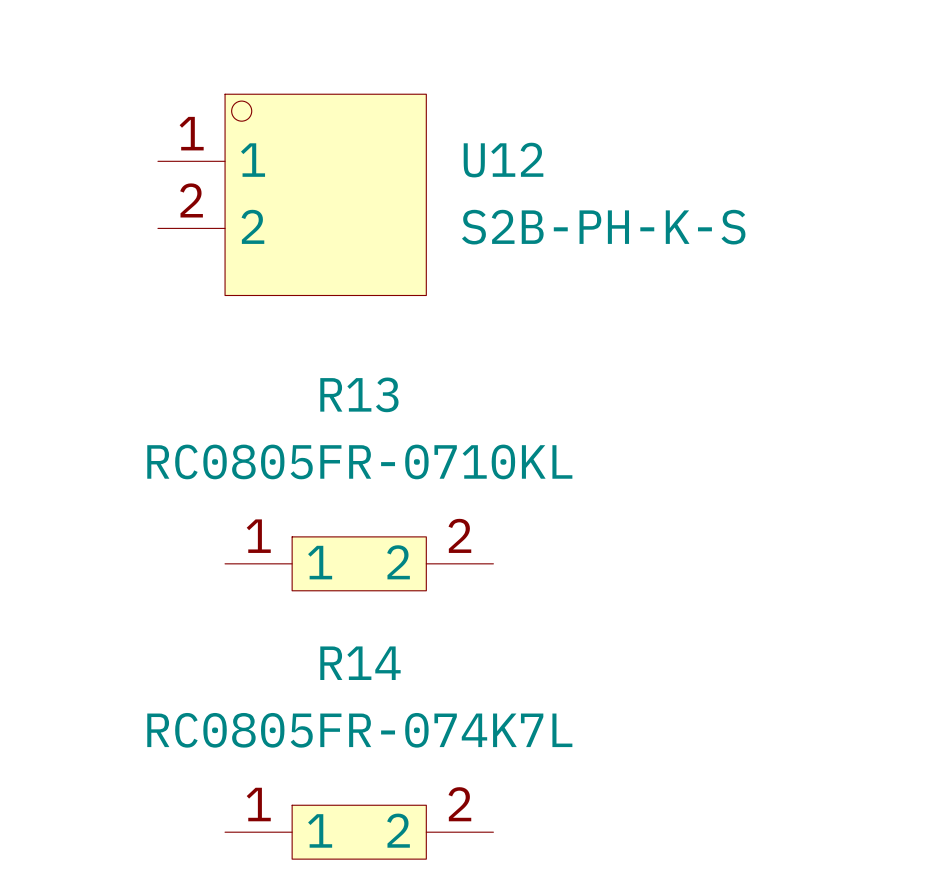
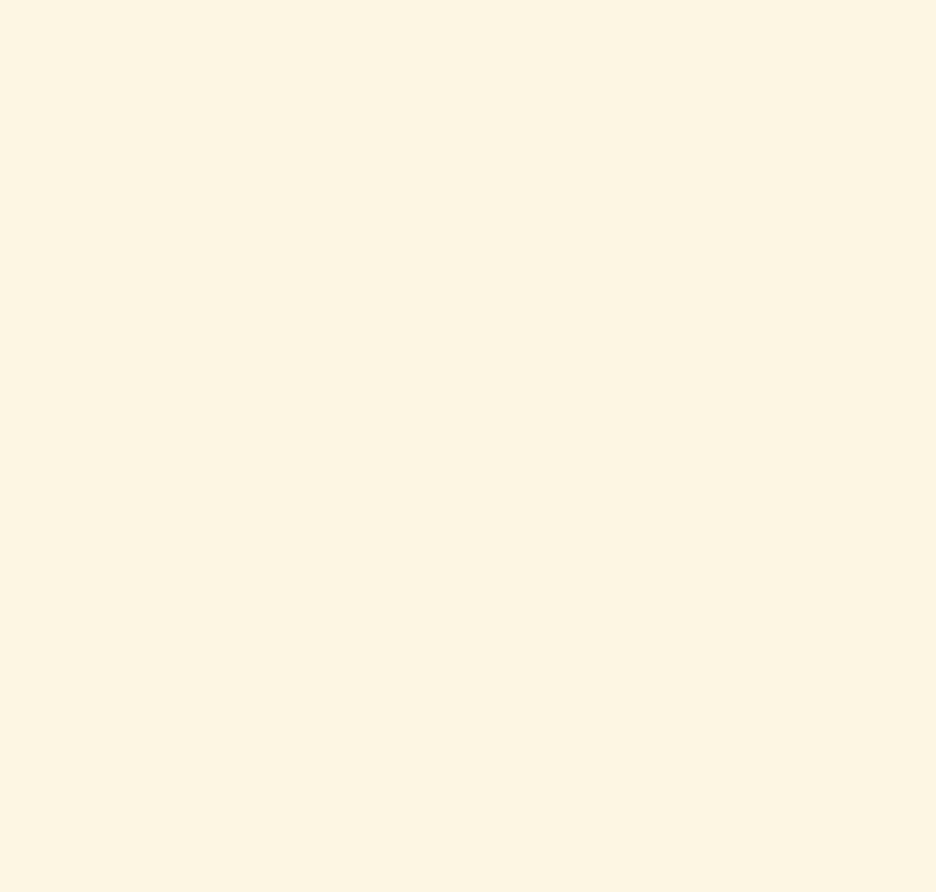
U12: S2B-PH-K-S (292, 194) -> none
R13: RC0805FR-0710KL (359, 563) -> none
R14: RC0805FR-074K7L (359, 832) -> none

